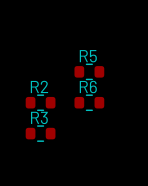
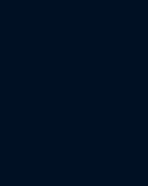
R5: (89, 71) -> none
R2: (40, 102) -> none
R6: (89, 102) -> none
R3: (40, 133) -> none

